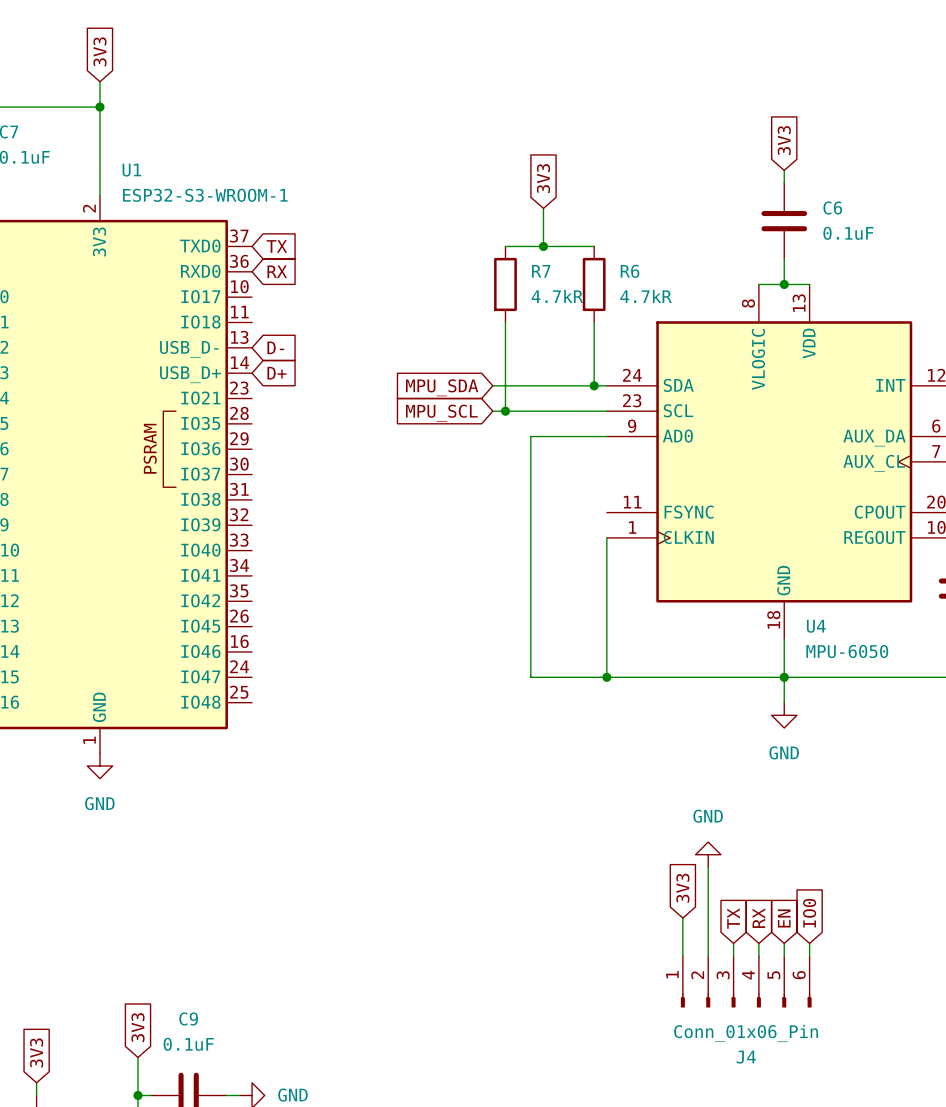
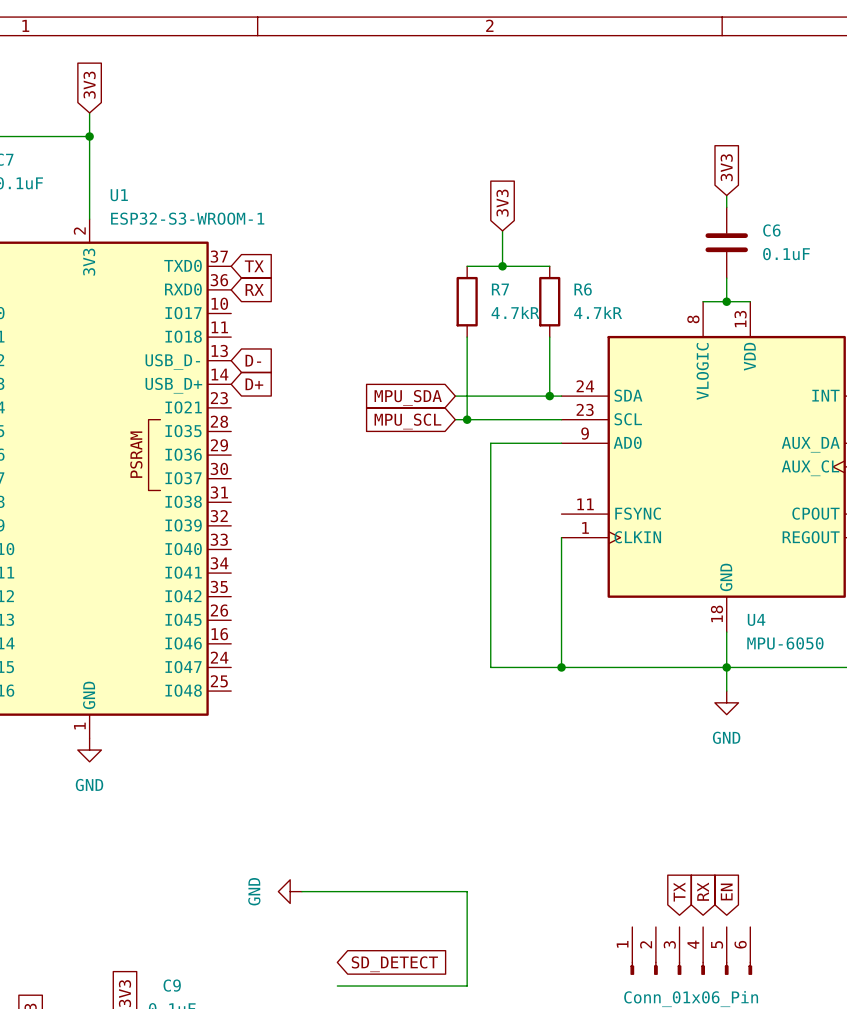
power symbol: GND (708, 854) -> none
wire: (708, 867) (708, 956) -> none
global label: 3V3 (682, 888) -> none
global label: IO0 (809, 913) -> none
power symbol: none -> GND (290, 891)
wire: none -> (301, 891) (467, 891) (467, 986) (337, 986)
wire: (682, 918) (682, 956) -> none
wire: (733, 943) (733, 956) -> none
wire: (758, 943) (758, 956) -> none
wire: (784, 943) (784, 956) -> none
wire: (809, 943) (809, 956) -> none
global label: none -> SD_DETECT (394, 964)

